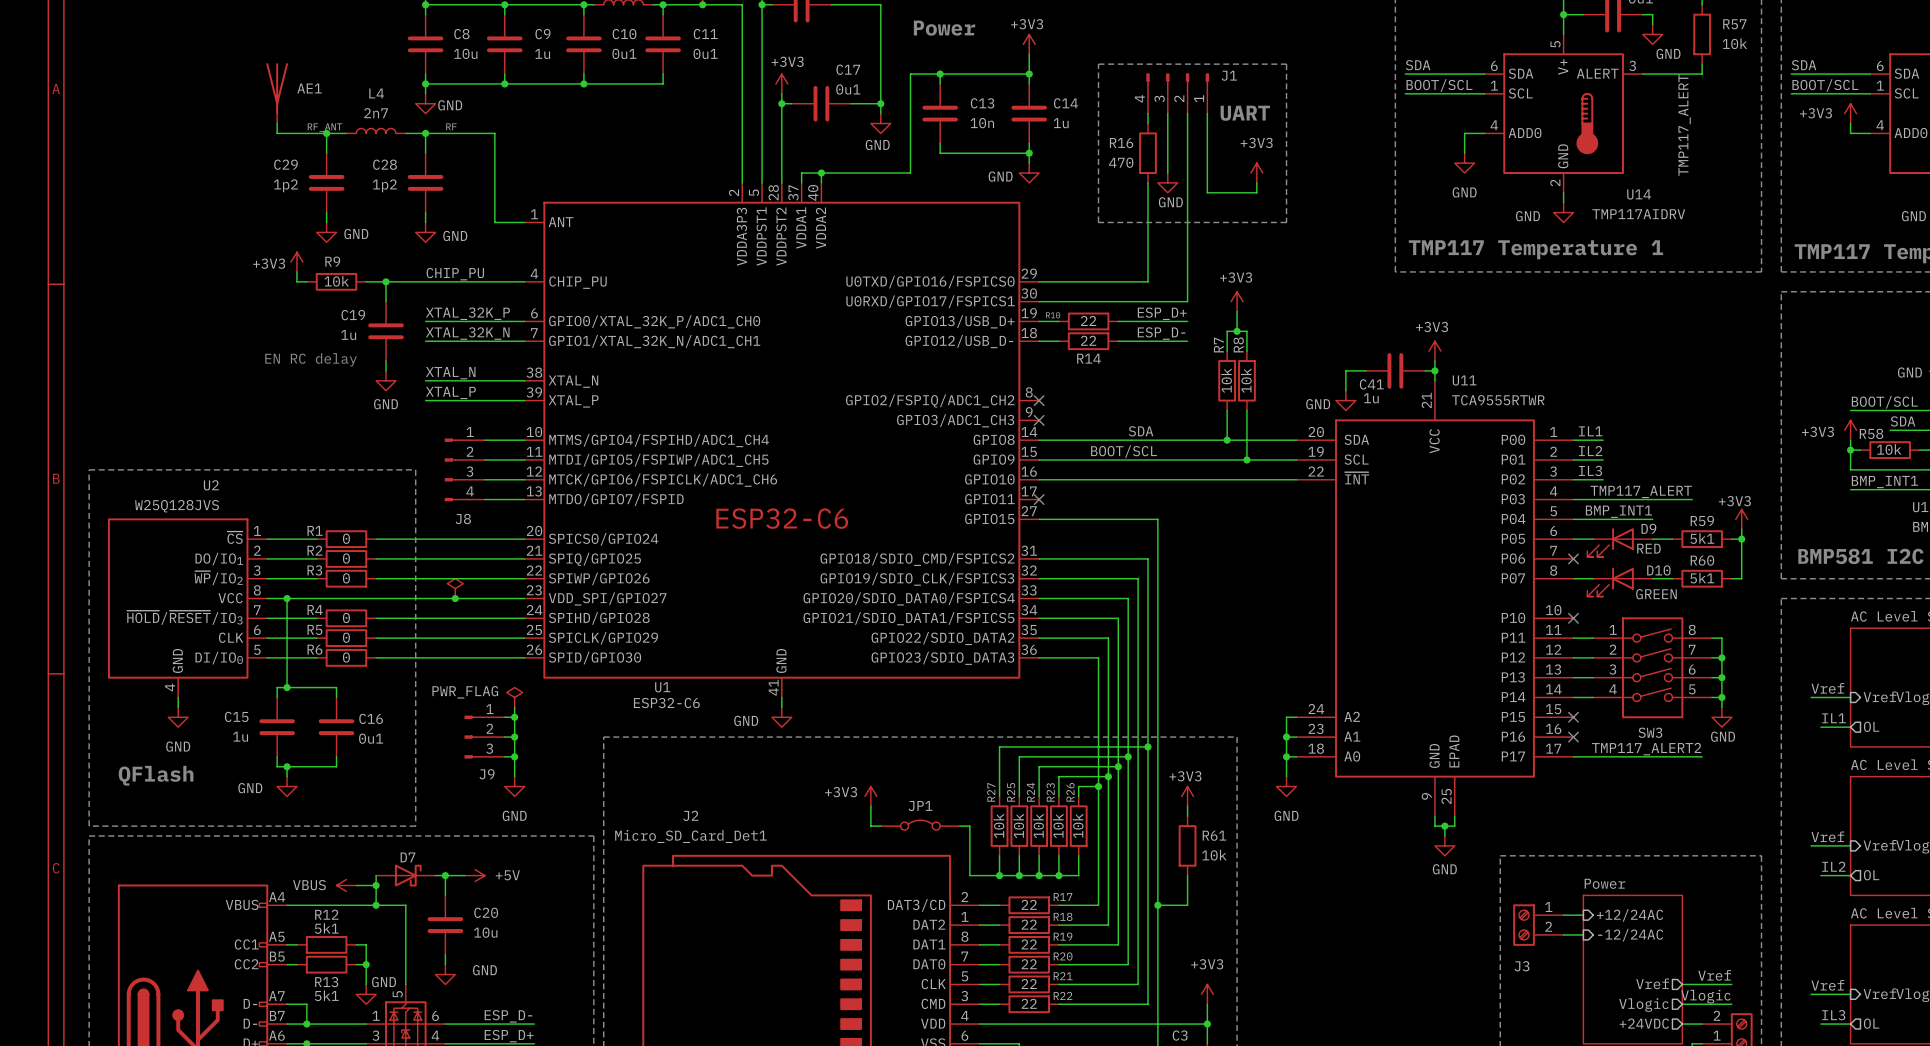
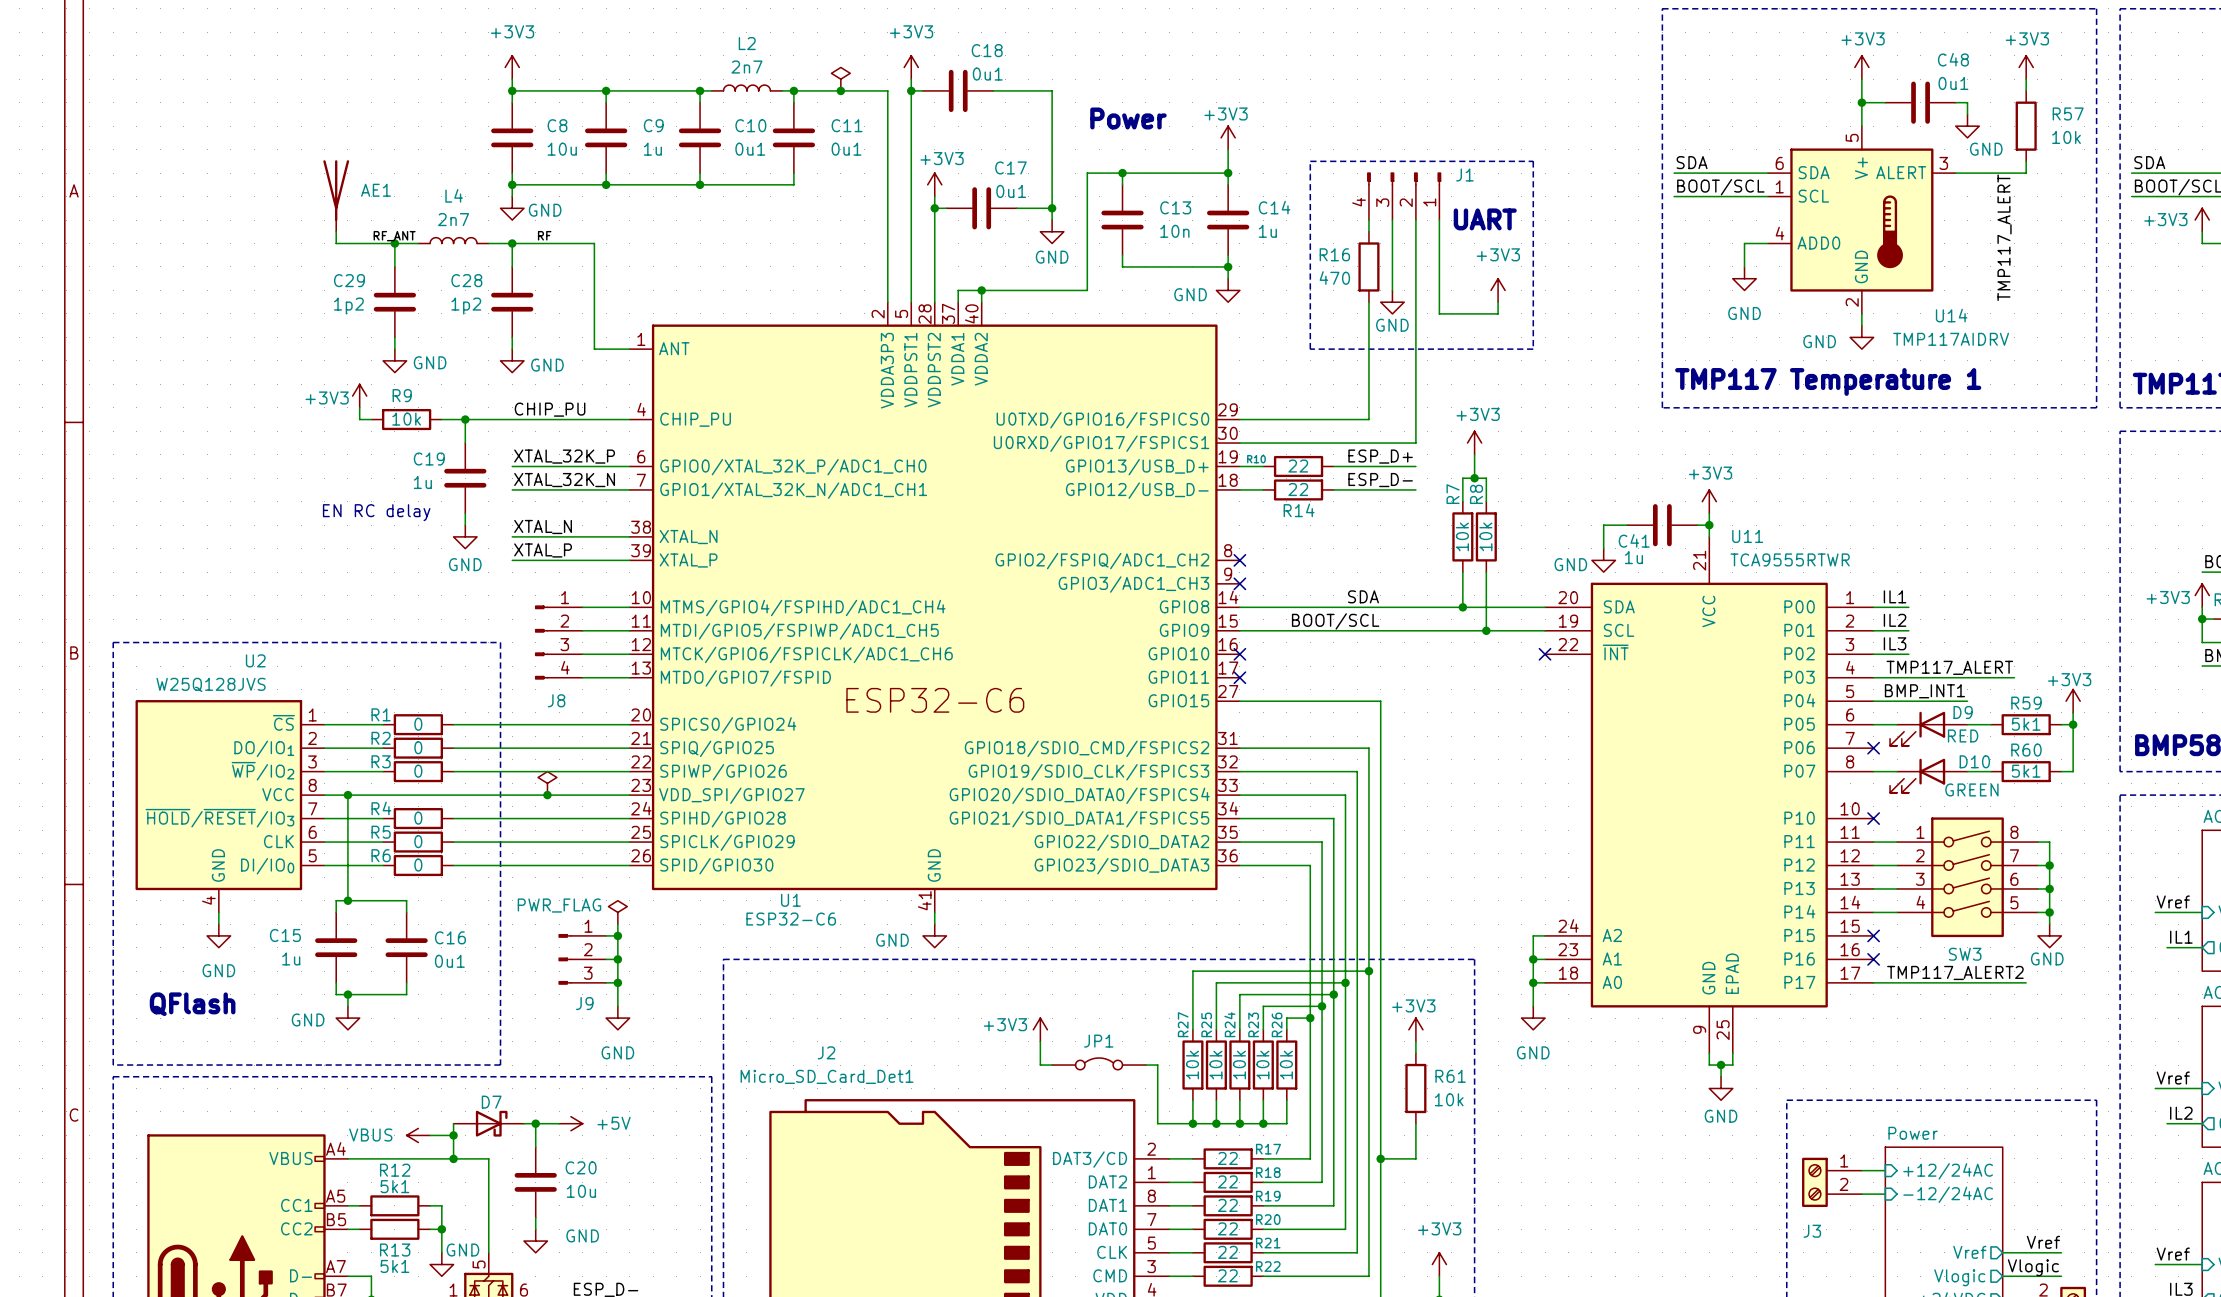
wire: (1039, 479) (1296, 479) -> none
no-connect mark: none -> (1239, 654)
no-connect mark: none -> (1545, 654)

